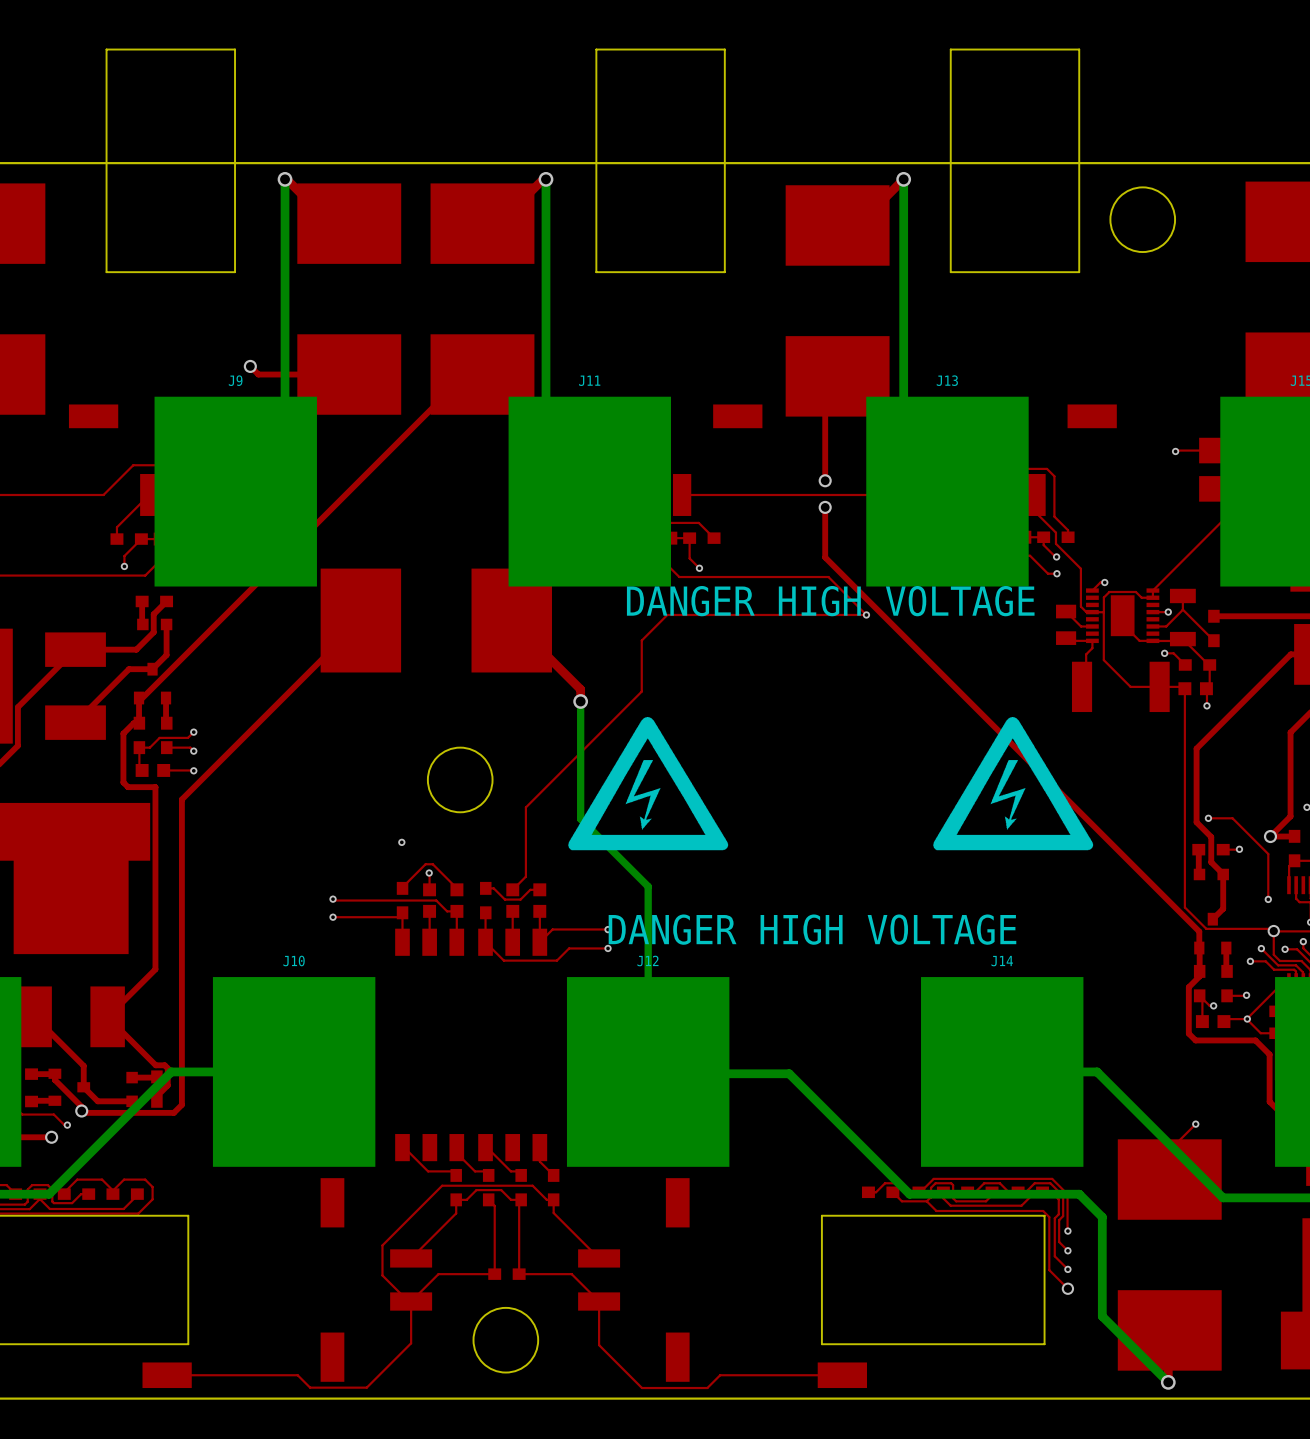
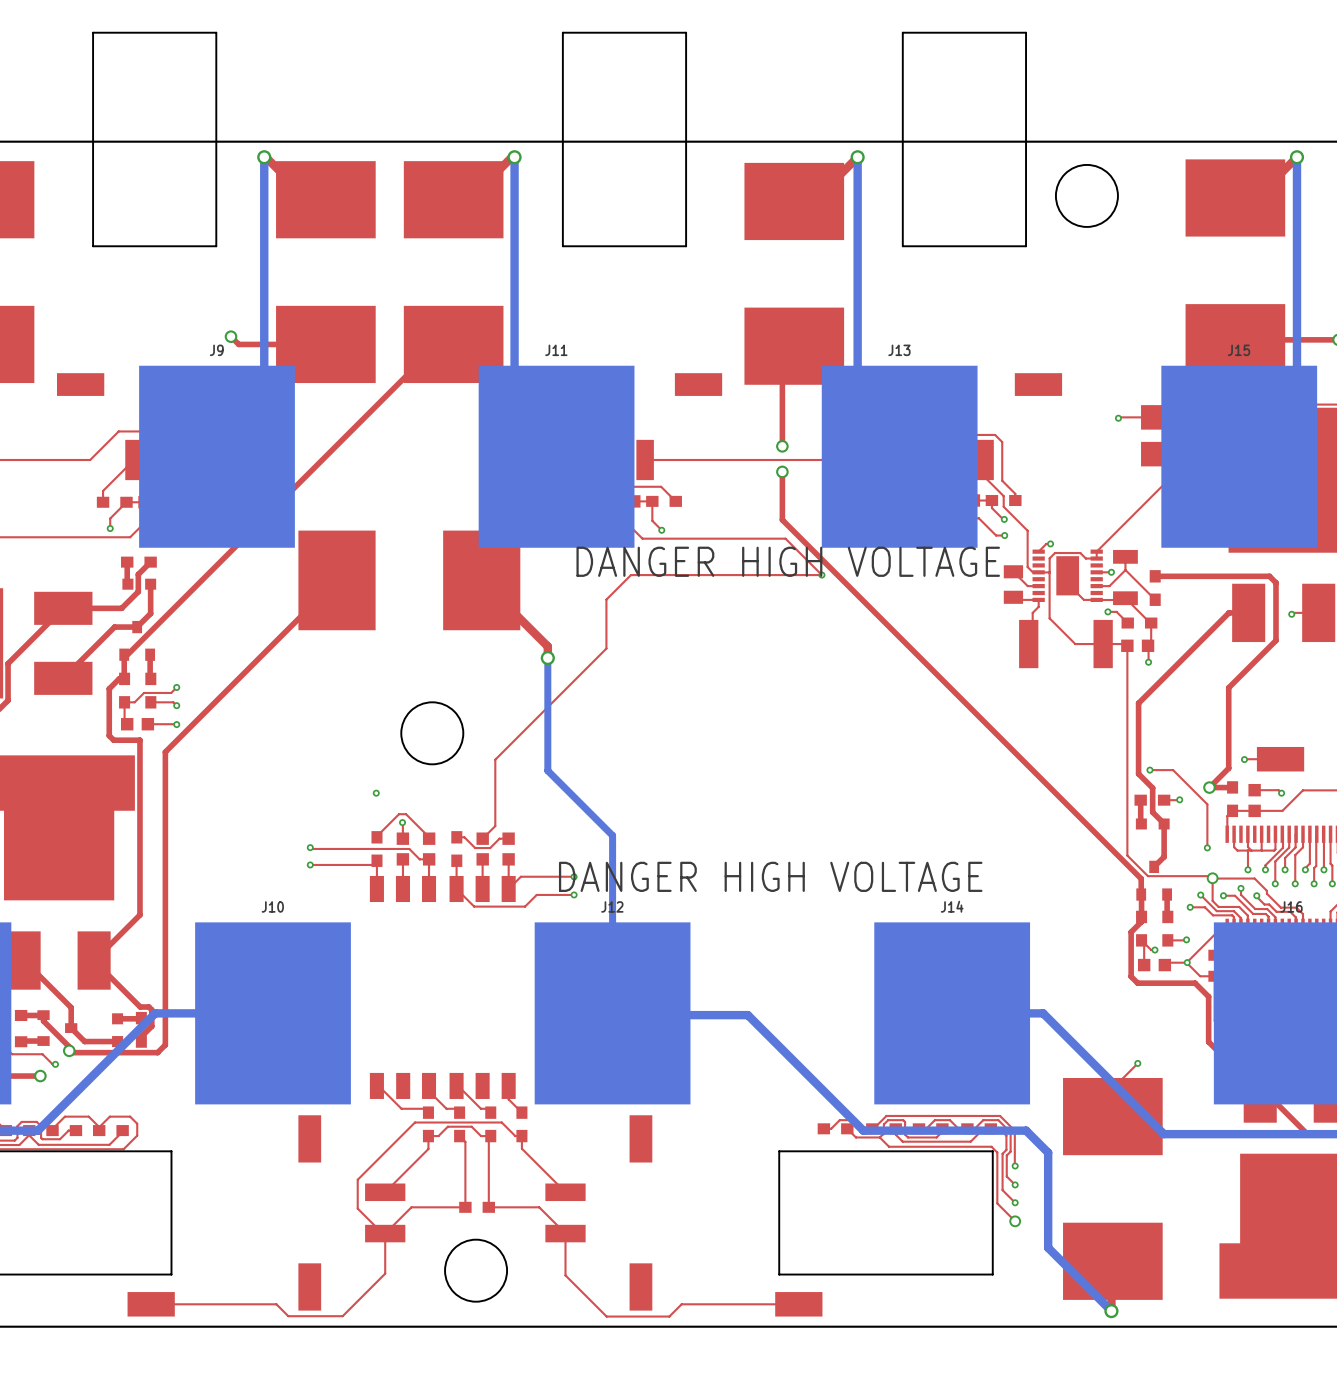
drawing: [568, 716, 729, 851] -> none
drawing: [933, 716, 1094, 851] -> none

